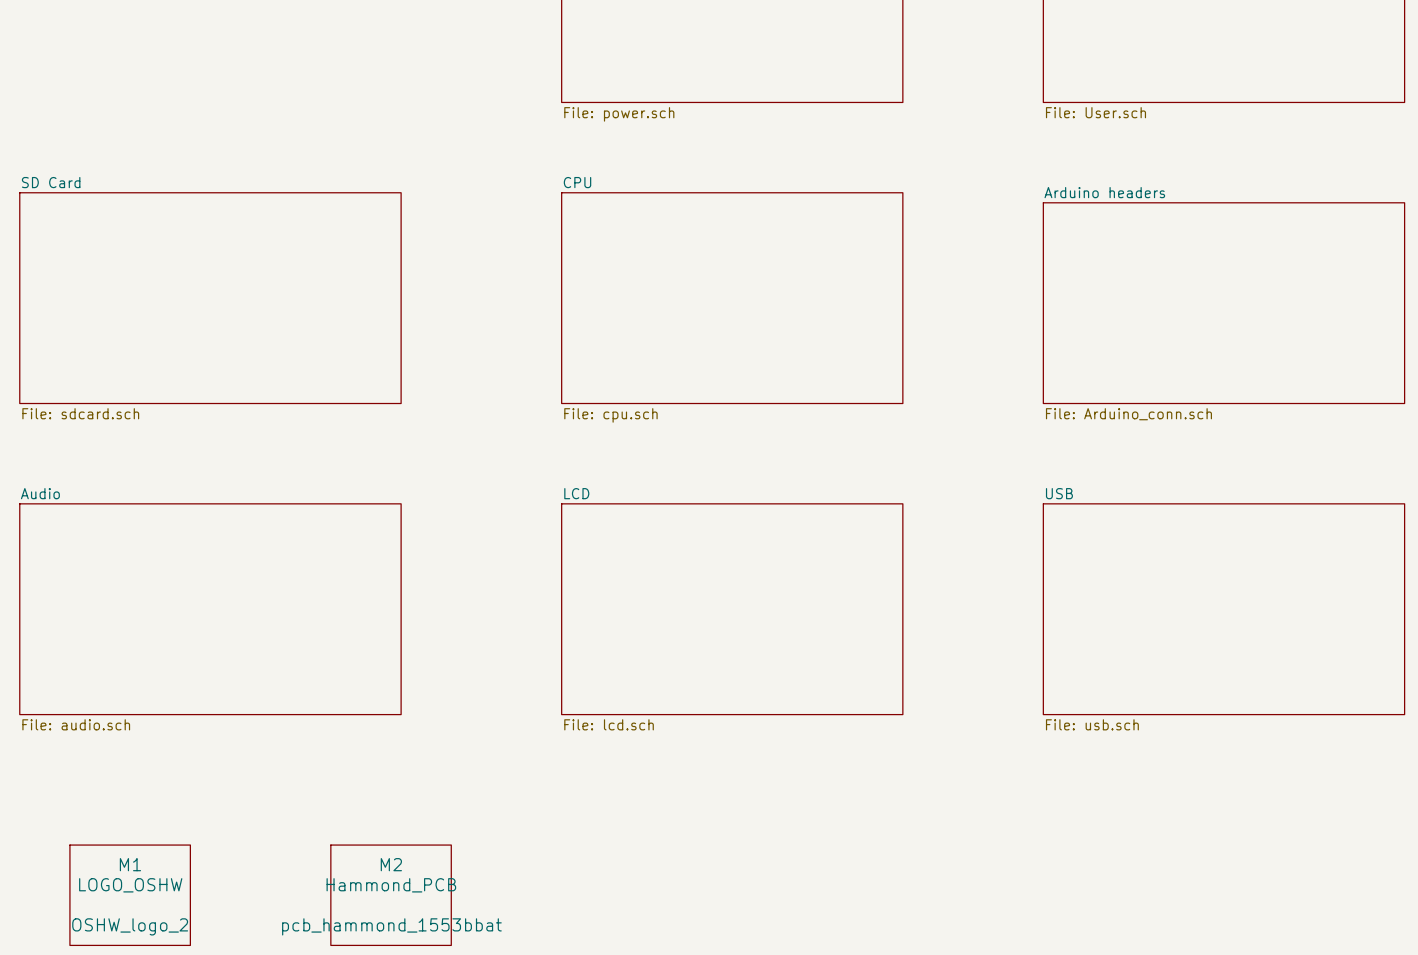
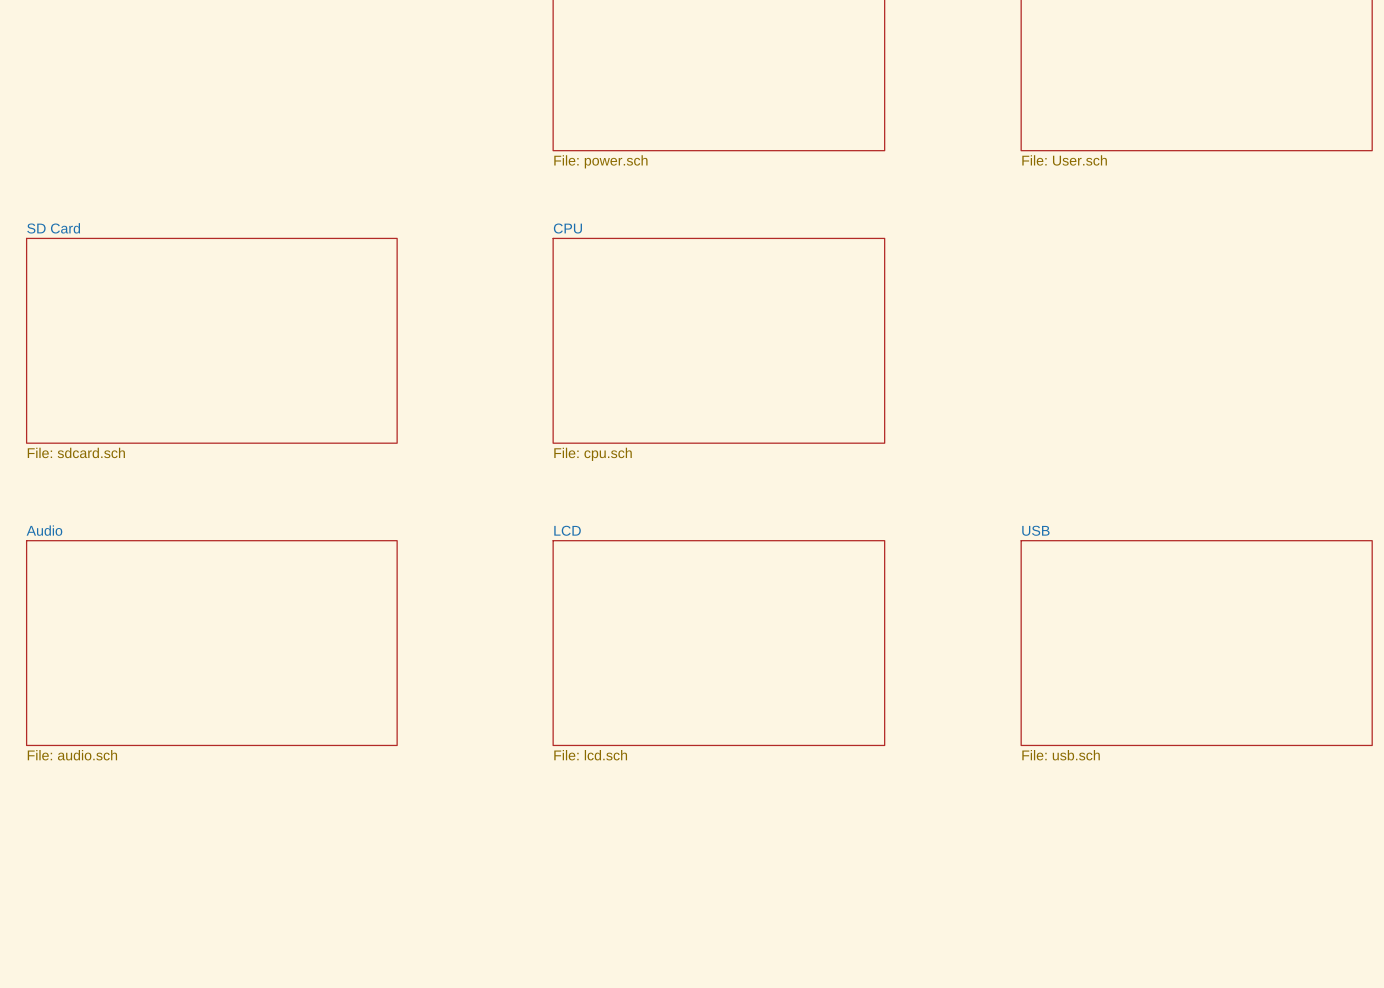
sheet Arduino headers: File: Arduino_conn.sch (1223, 303) -> none
M1: LOGO_OSHW (130, 895) -> none
M2: Hammond_PCB (391, 895) -> none

